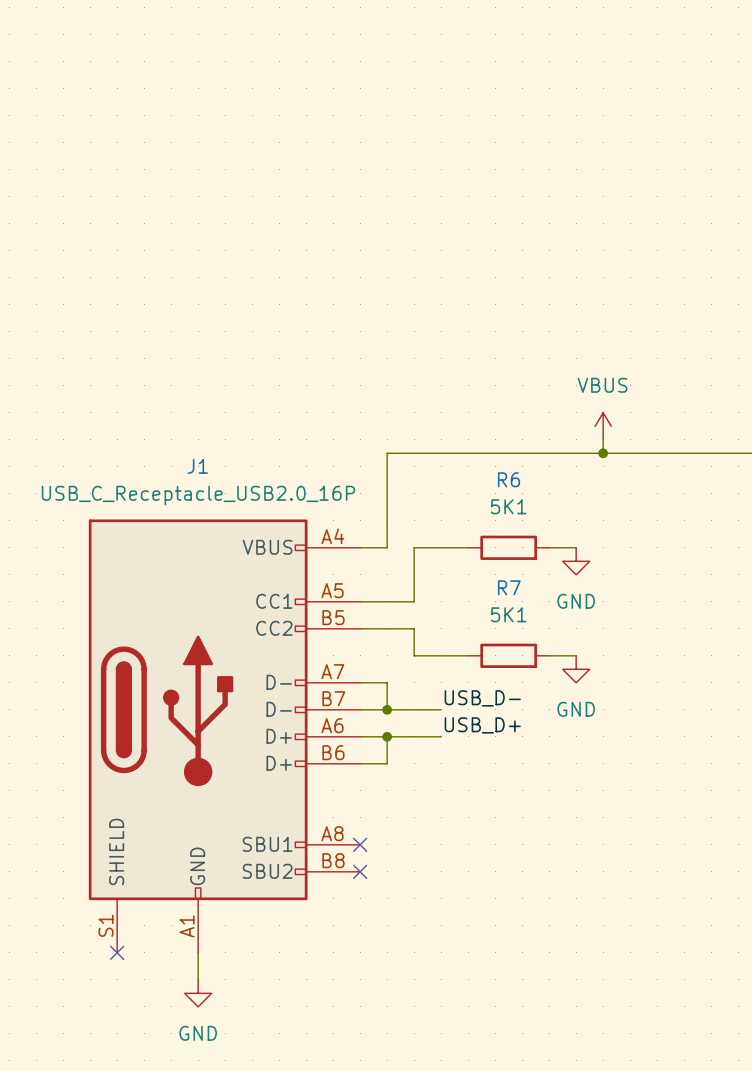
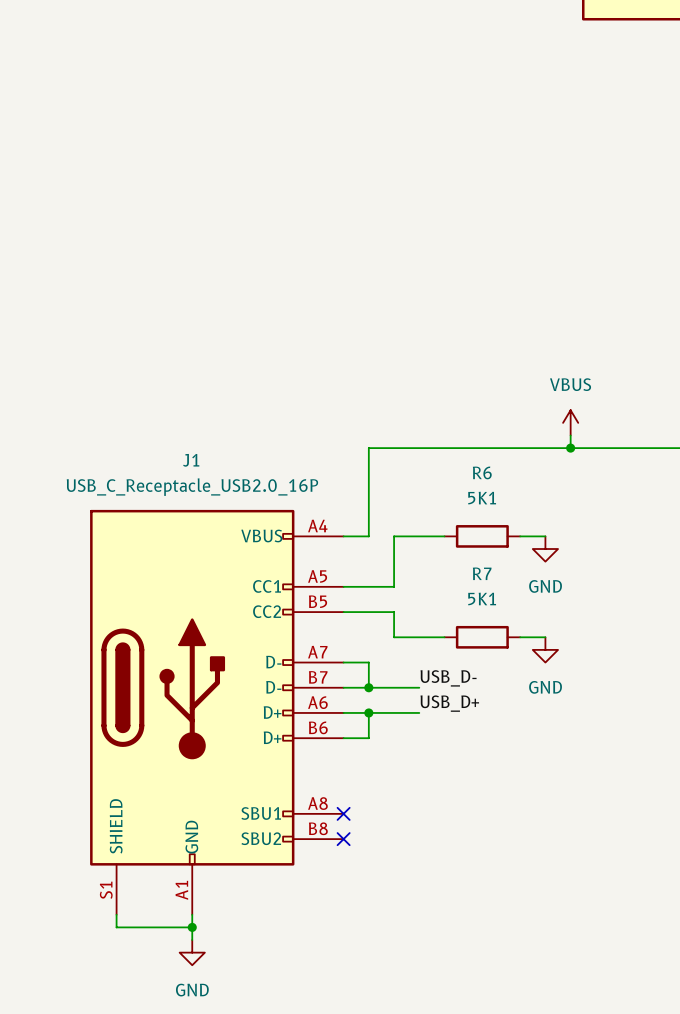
wire: none -> (116, 914) (116, 927) (192, 927)
no-connect mark: (117, 952) -> none
junction: none -> (192, 927)

